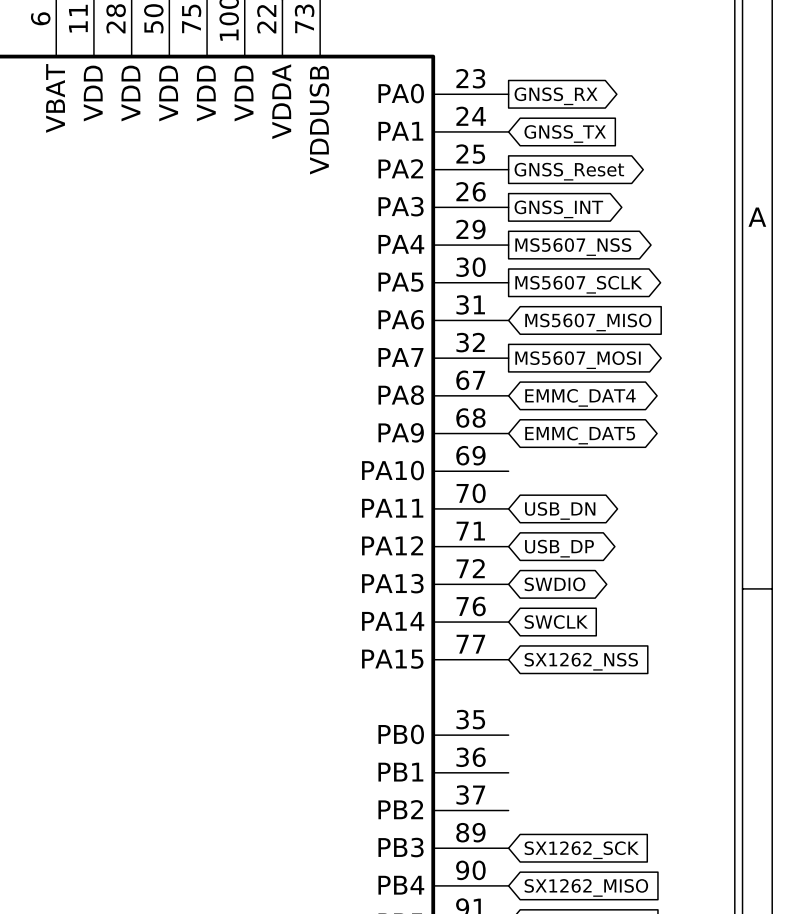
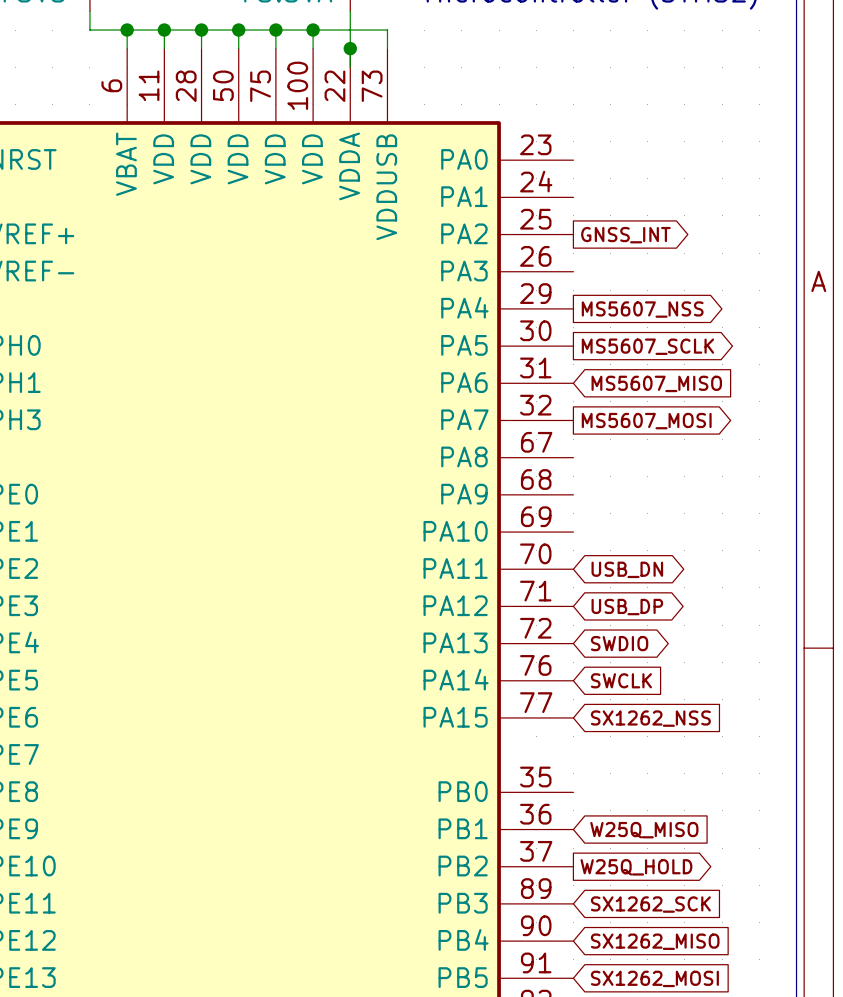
global label: GNSS_RX (556, 96) -> none
global label: GNSS_TX (565, 133) -> none
global label: GNSS_Reset (569, 171) -> GNSS_INT (625, 235)
global label: GNSS_INT (558, 209) -> none
global label: EMMC_DAT4 (580, 397) -> none
global label: EMMC_DAT5 (580, 435) -> none
global label: none -> W25Q_MISO (644, 830)
global label: none -> W25Q_HOLD (636, 867)

